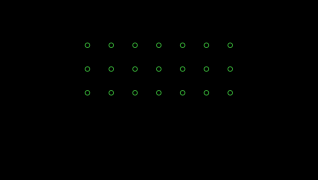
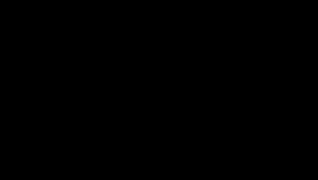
part: (158, 69) -> none

